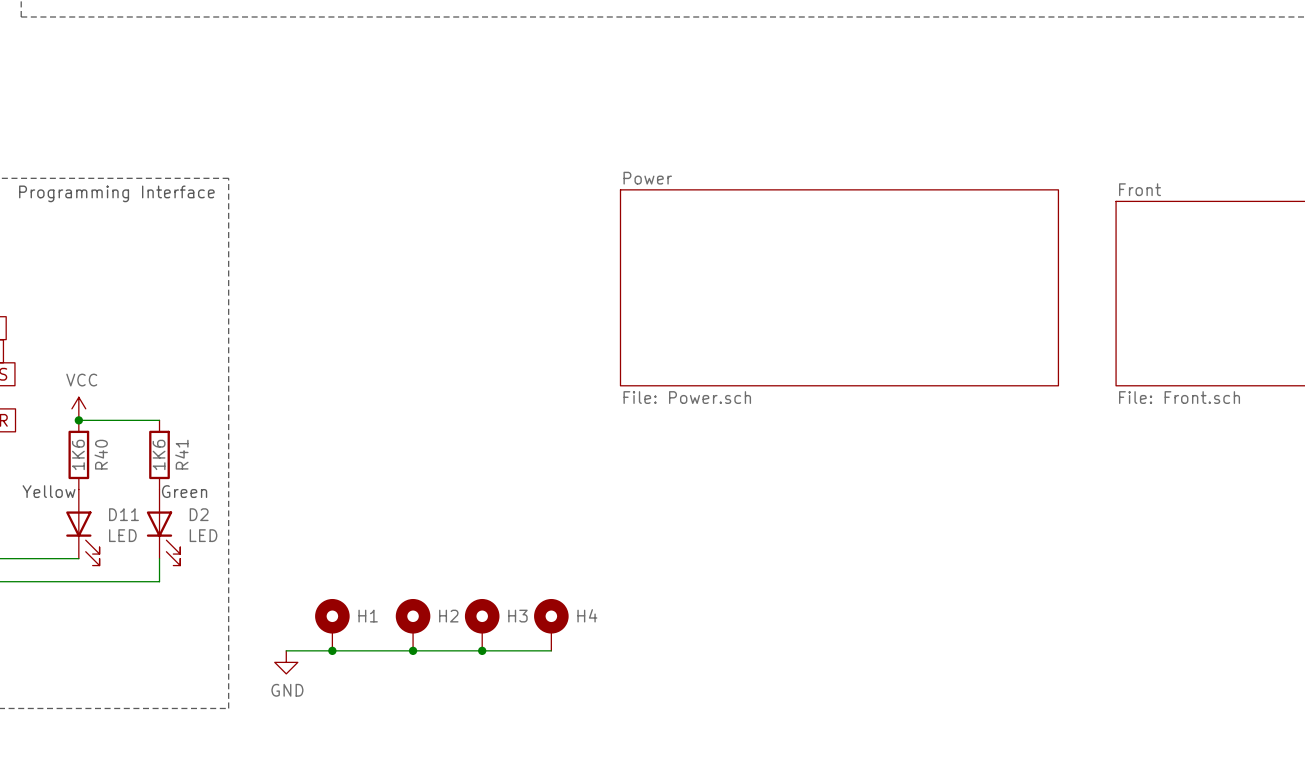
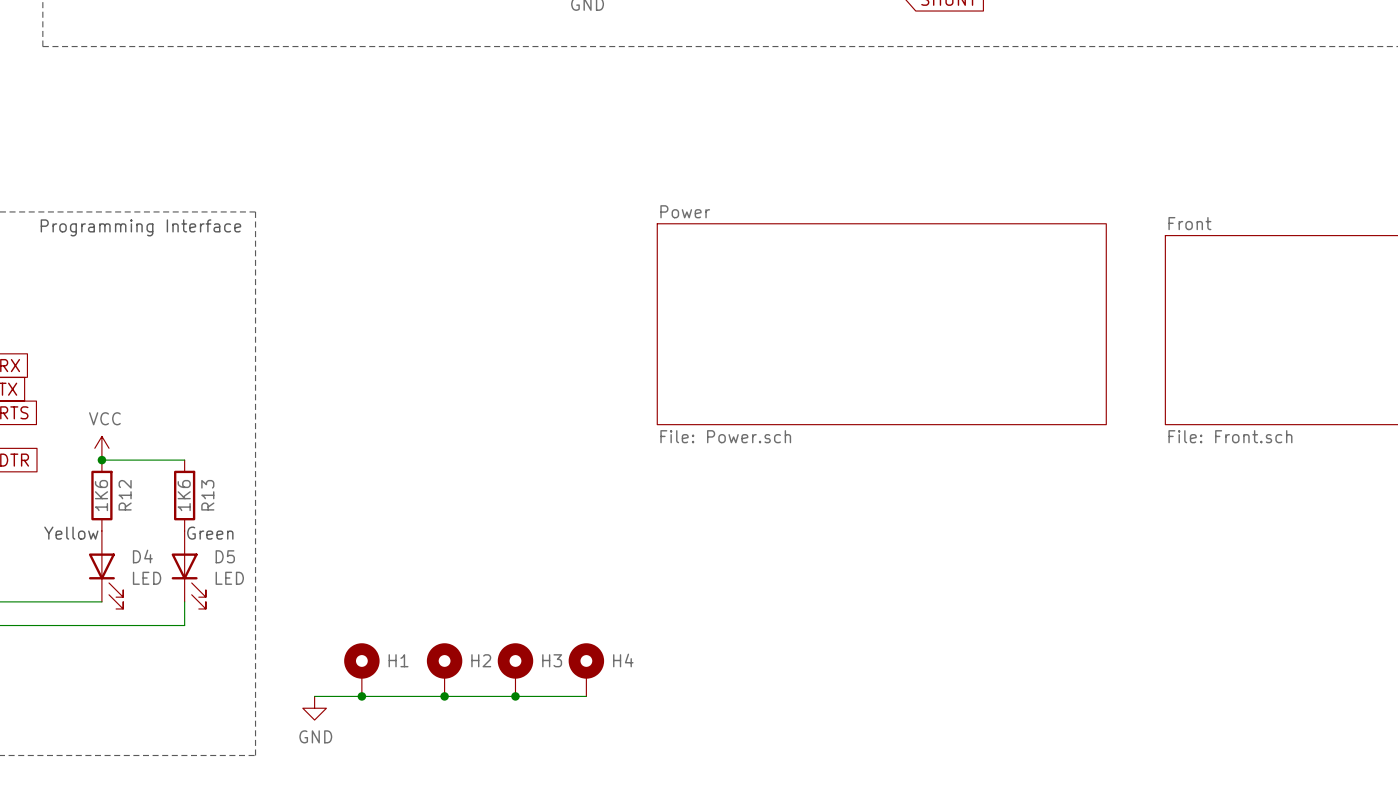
R40 name: R40 (101, 454) -> R12 (125, 495)
R41 name: R41 (181, 454) -> R13 (207, 495)
D11 name: D11 (123, 514) -> D4 (142, 556)
D2 name: D2 (199, 514) -> D5 (225, 556)

